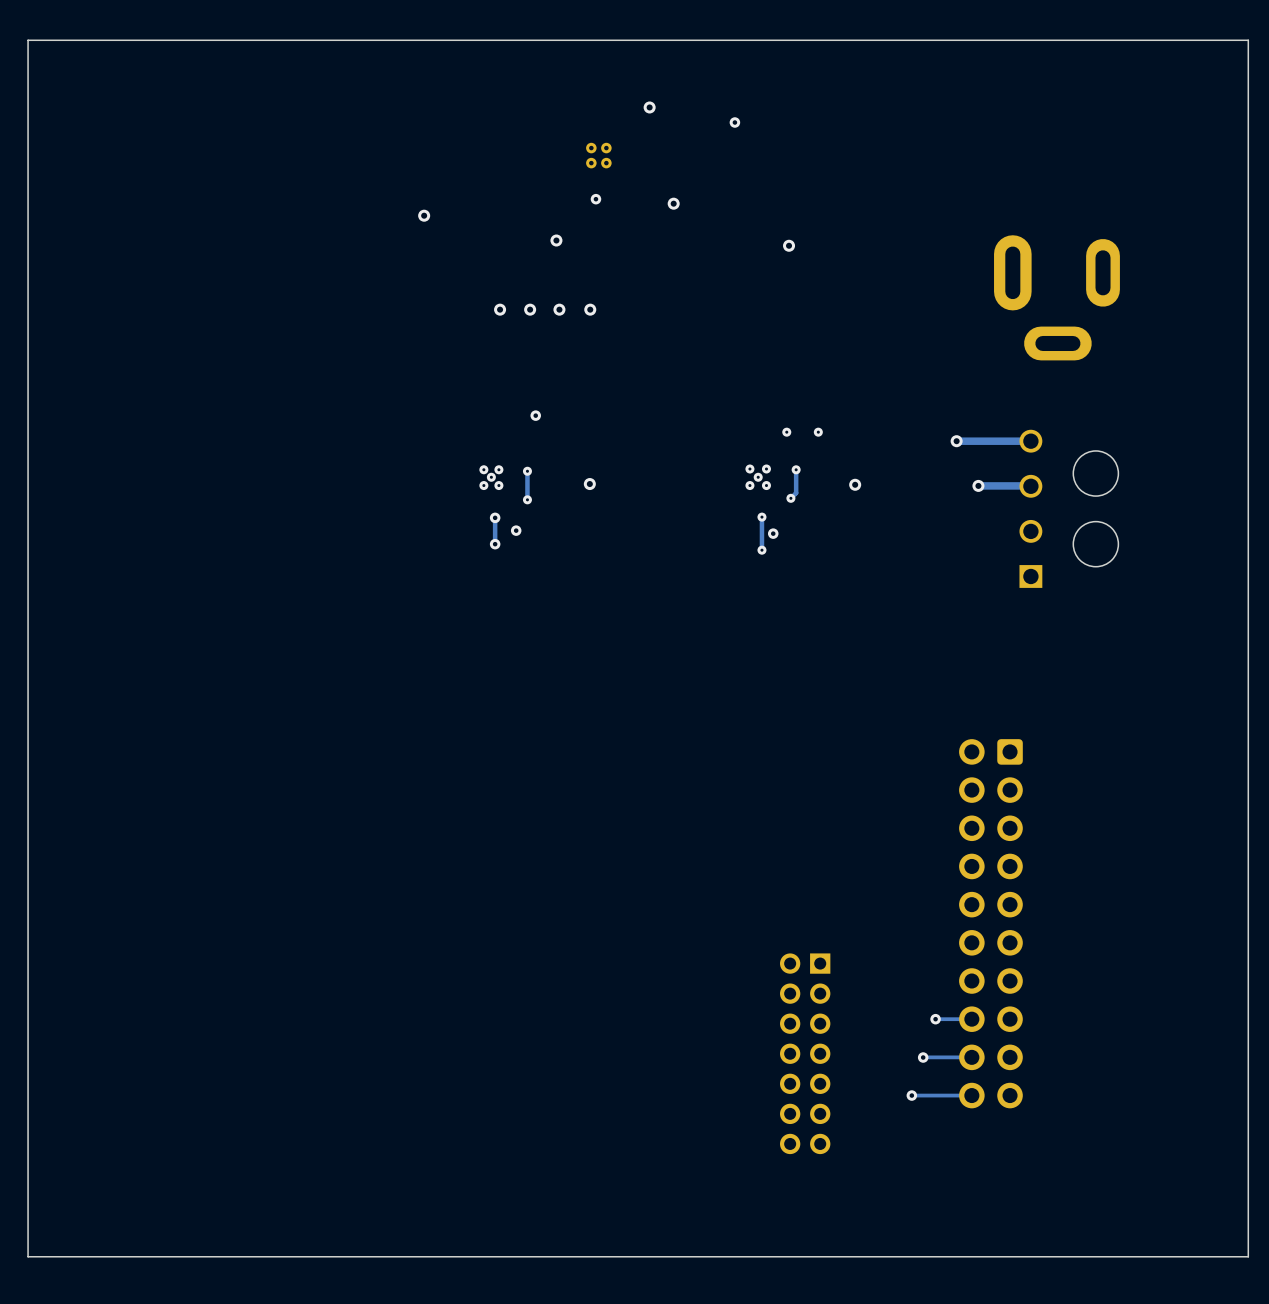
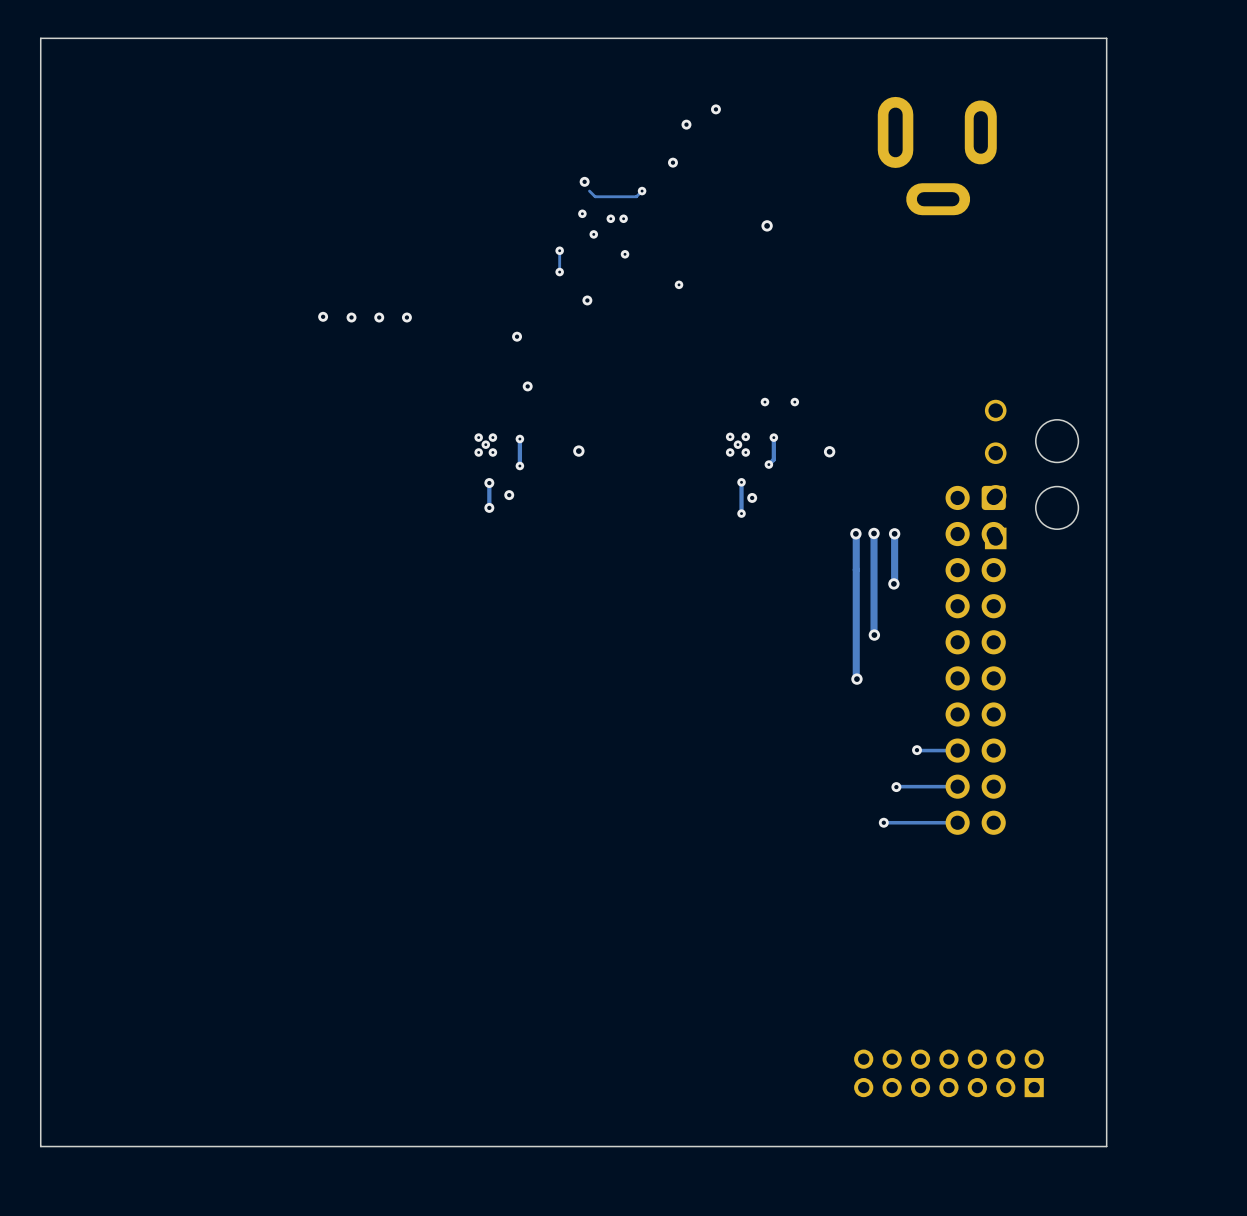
board edge: (1248, 40) (28, 40) (28, 1256) (1248, 1256) (1248, 40) -> (1106, 38) (1106, 1146) (40, 1146) (40, 38) (1106, 38)
via: (649, 107) -> none
via: none -> (686, 124)
part: (598, 155) -> none
via: none -> (672, 162)
via: (673, 203) -> none
track: none -> (642, 191) (636, 196) (595, 196) (589, 191)
via: none -> (642, 191)
via: (424, 215) -> none
via: none -> (582, 213)
via: none -> (610, 218)
via: none -> (623, 218)
via: (556, 240) -> none
via: none -> (593, 234)
track: none -> (559, 250) (559, 272)
via: none -> (559, 250)
via: none -> (625, 254)
via: none -> (559, 272)
part position: (1056, 297) -> (937, 156)
via: none -> (679, 284)
via: (500, 309) -> none
via: (530, 309) -> none
via: (559, 309) -> none
via: (590, 309) -> none
via: none -> (587, 300)
via: none -> (323, 316)
via: none -> (351, 317)
via: none -> (379, 317)
via: none -> (406, 317)
via: none -> (517, 336)
via: (956, 441) -> none
track: (1030, 441) (956, 441) -> none
track: (978, 485) (1030, 486) -> none
via: (978, 485) -> none
track: none -> (855, 533) (856, 679)
via: none -> (855, 533)
track: none -> (874, 533) (874, 635)
via: none -> (874, 533)
track: none -> (894, 533) (893, 583)
via: none -> (894, 533)
via: none -> (893, 583)
via: none -> (874, 635)
via: none -> (856, 679)
track: none -> (916, 750) (957, 750)
via: none -> (916, 750)
via: none -> (896, 787)
track: none -> (957, 786) (896, 787)
via: none -> (883, 822)
track: none -> (957, 822) (883, 822)
part position: (990, 923) -> (975, 660)
via: (935, 1019) -> none
track: (971, 1019) (935, 1019) -> none
part rotation: 0° (805, 1053) -> 90° clockwise (948, 1073)
part position: (805, 1053) -> (948, 1073)
via: (923, 1057) -> none
track: (971, 1057) (923, 1057) -> none
via: (911, 1095) -> none
track: (971, 1095) (911, 1095) -> none

